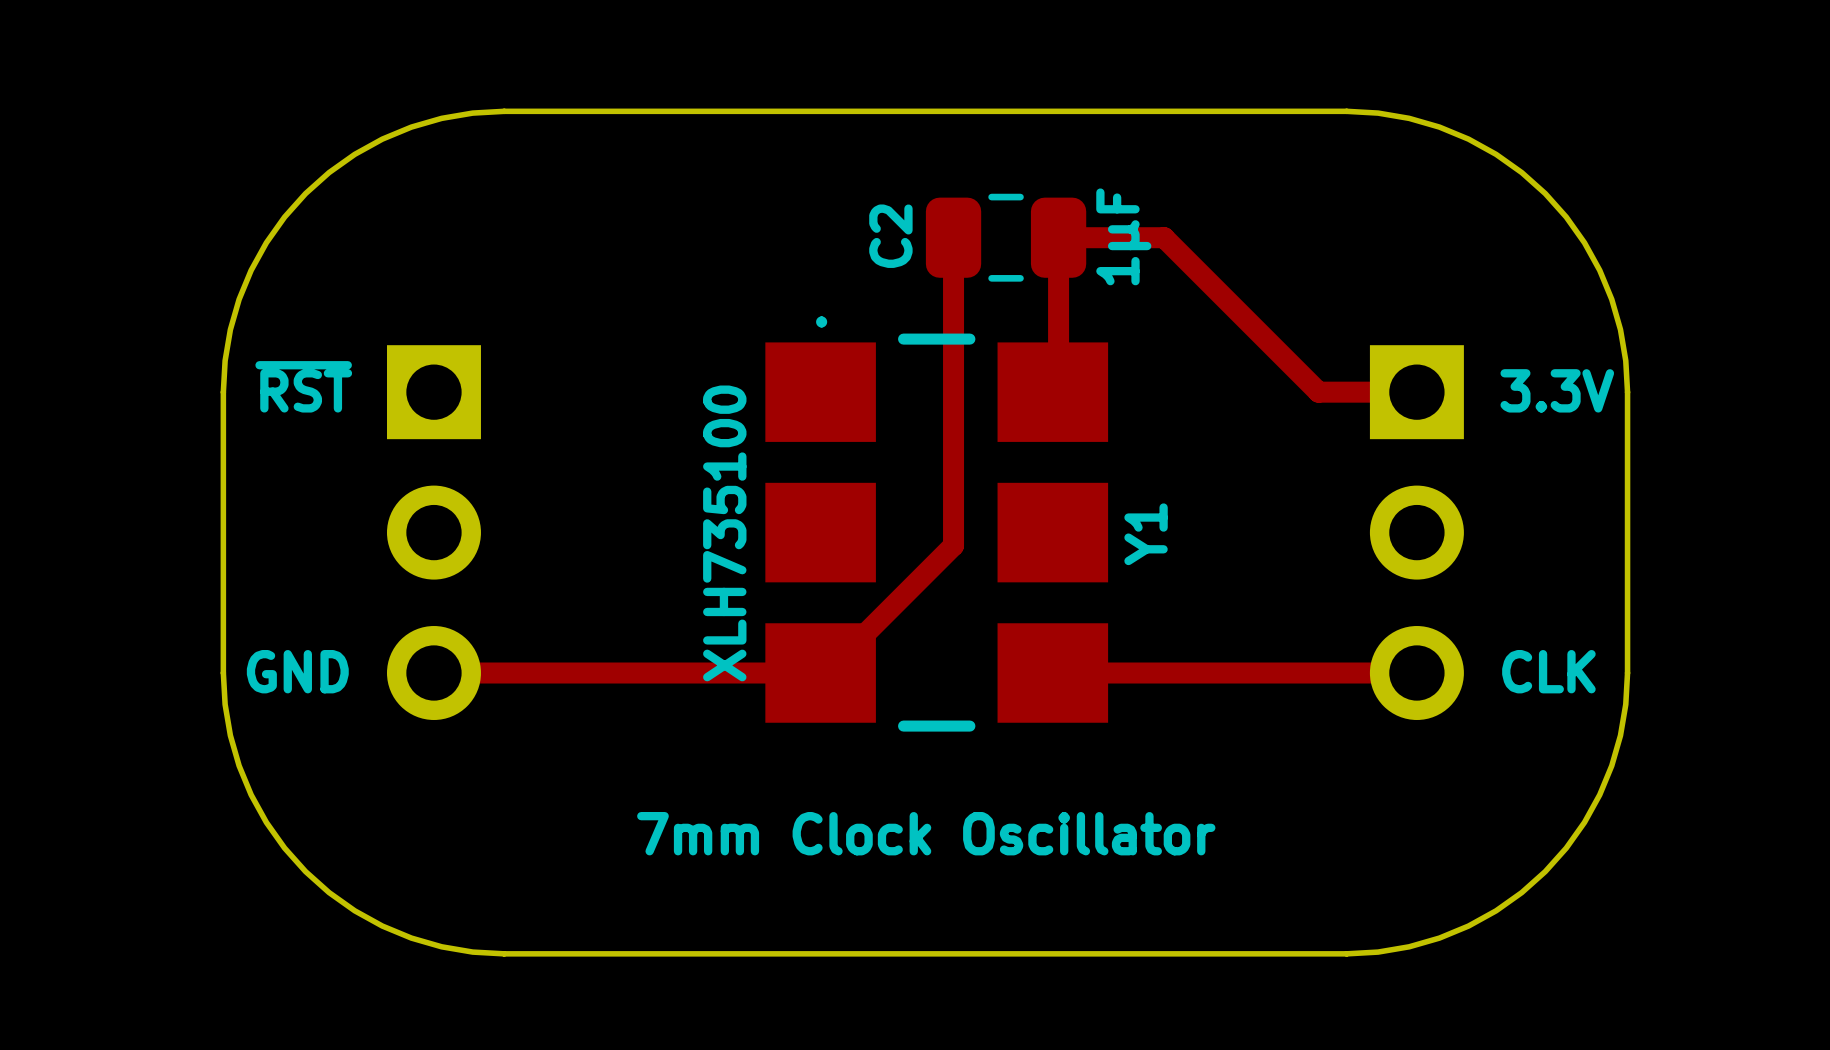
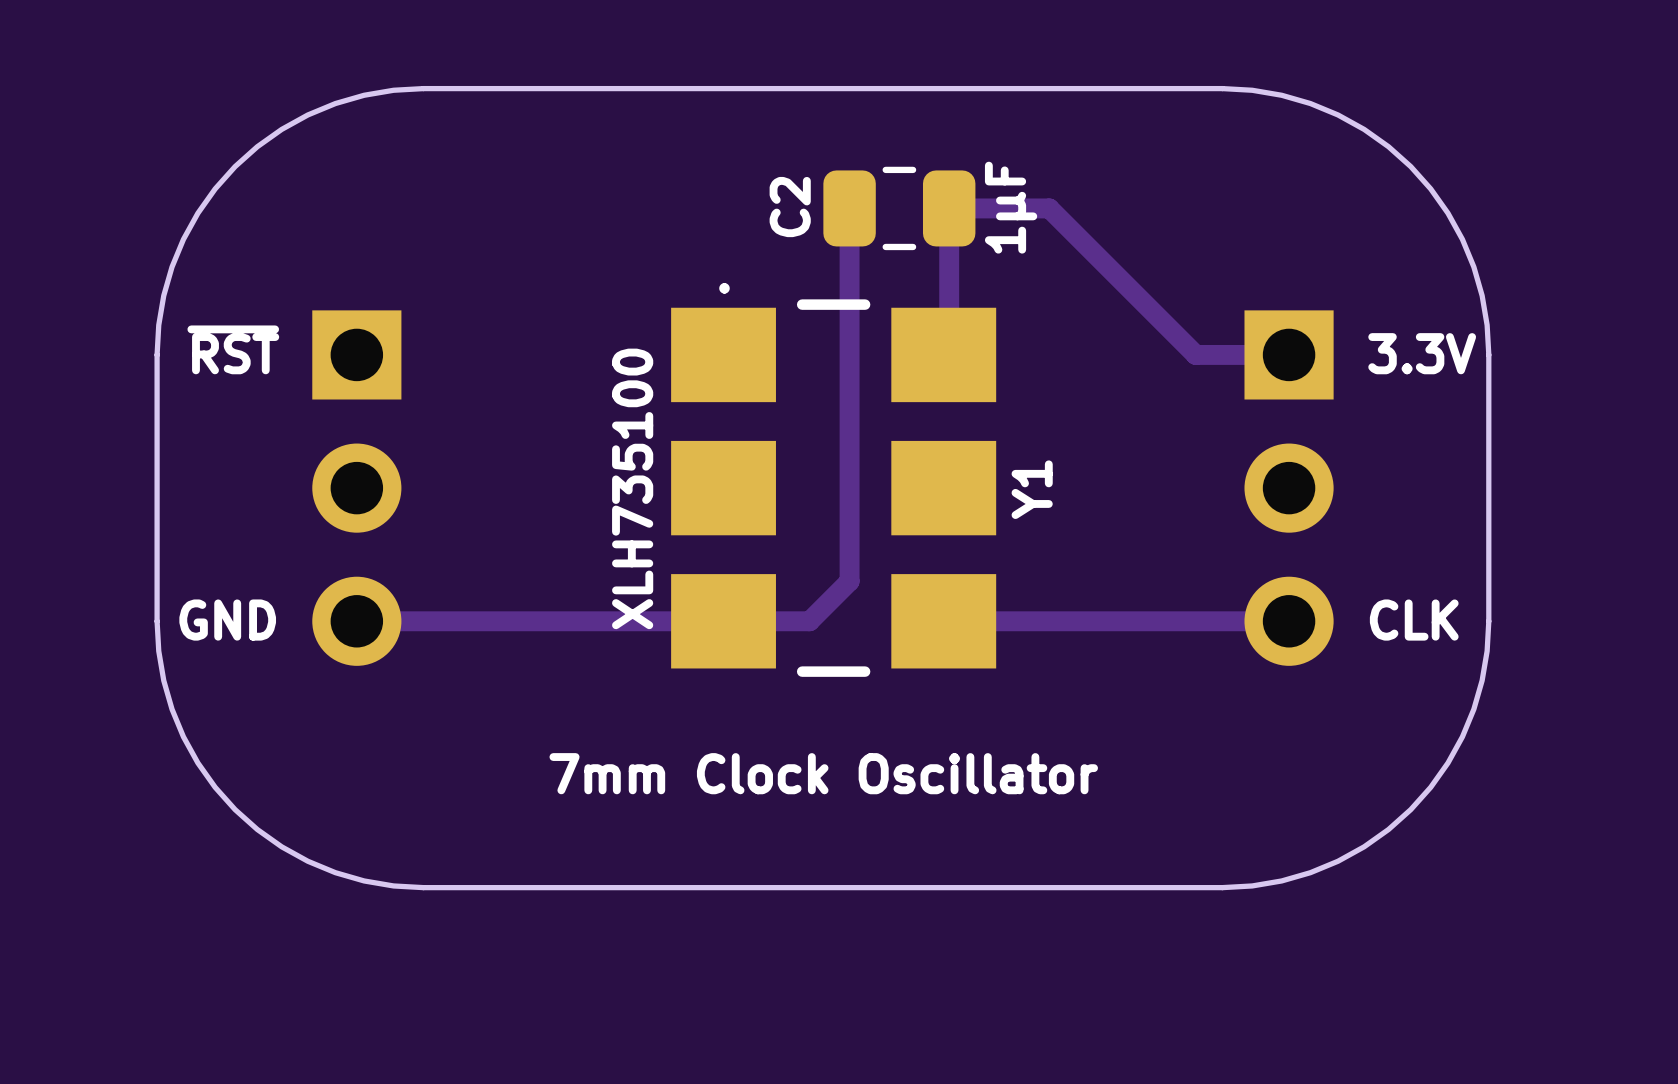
track: (953, 545) (826, 673) -> (849, 500) (849, 581) (809, 621) (728, 621)

